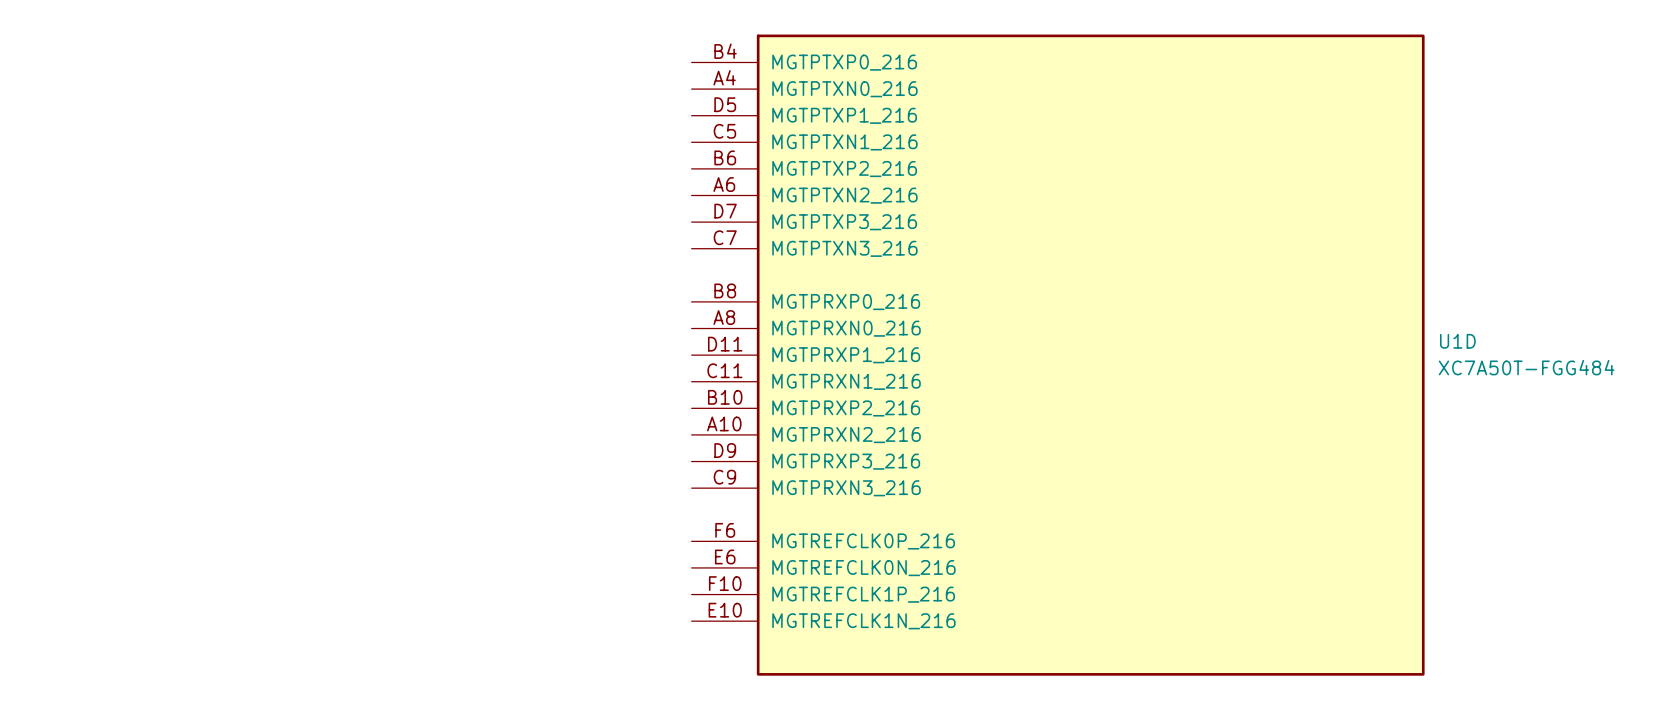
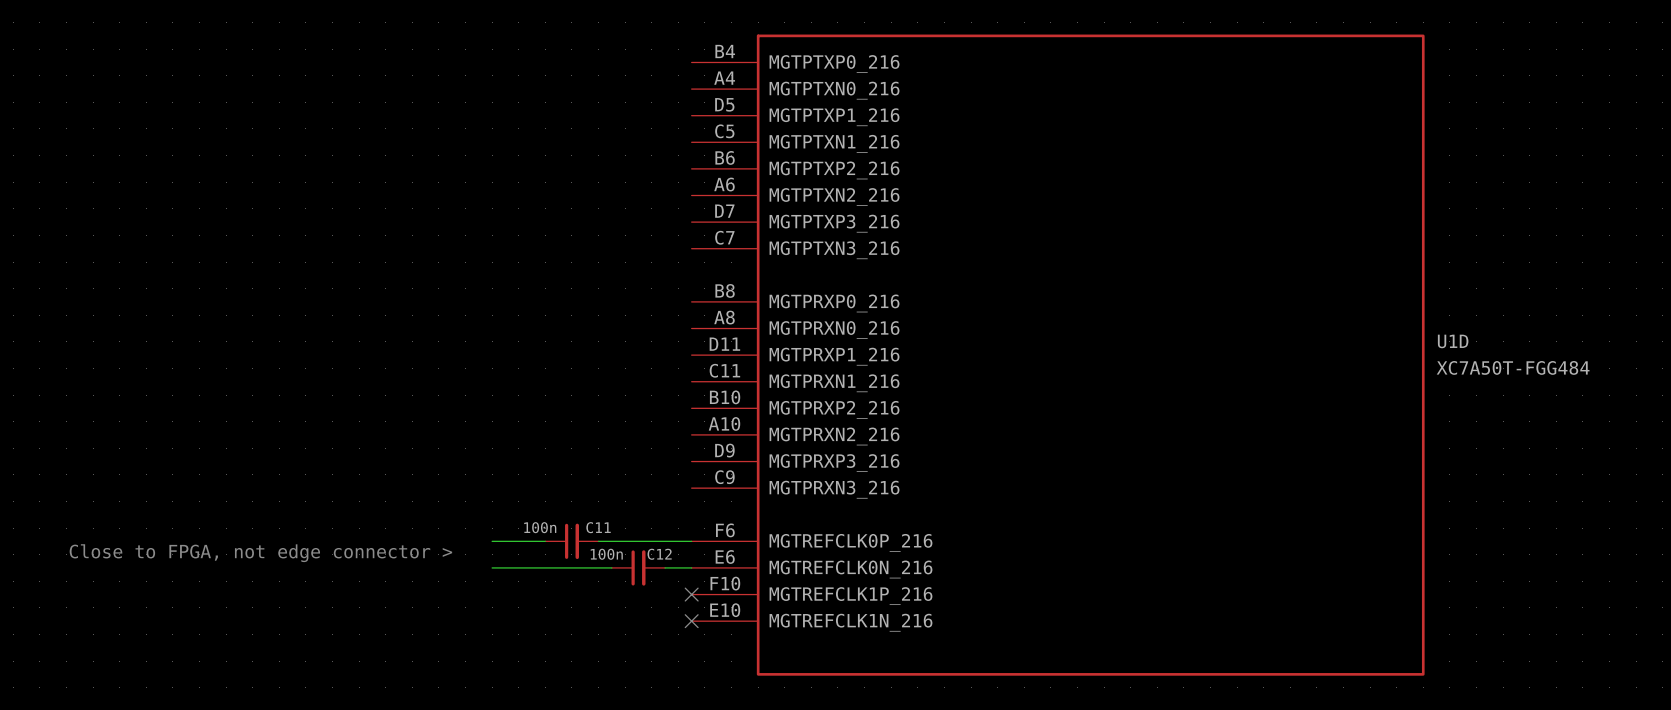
wire: none -> (492, 541) (545, 541)
C11: none -> 100n (571, 541)
wire: none -> (598, 541) (691, 541)
text: none -> Close to FPGA, not edge connector > (260, 553)
wire: none -> (492, 567) (611, 567)
C12: none -> 100n (638, 567)
wire: none -> (665, 567) (691, 567)
no-connect mark: none -> (691, 594)
no-connect mark: none -> (691, 621)

